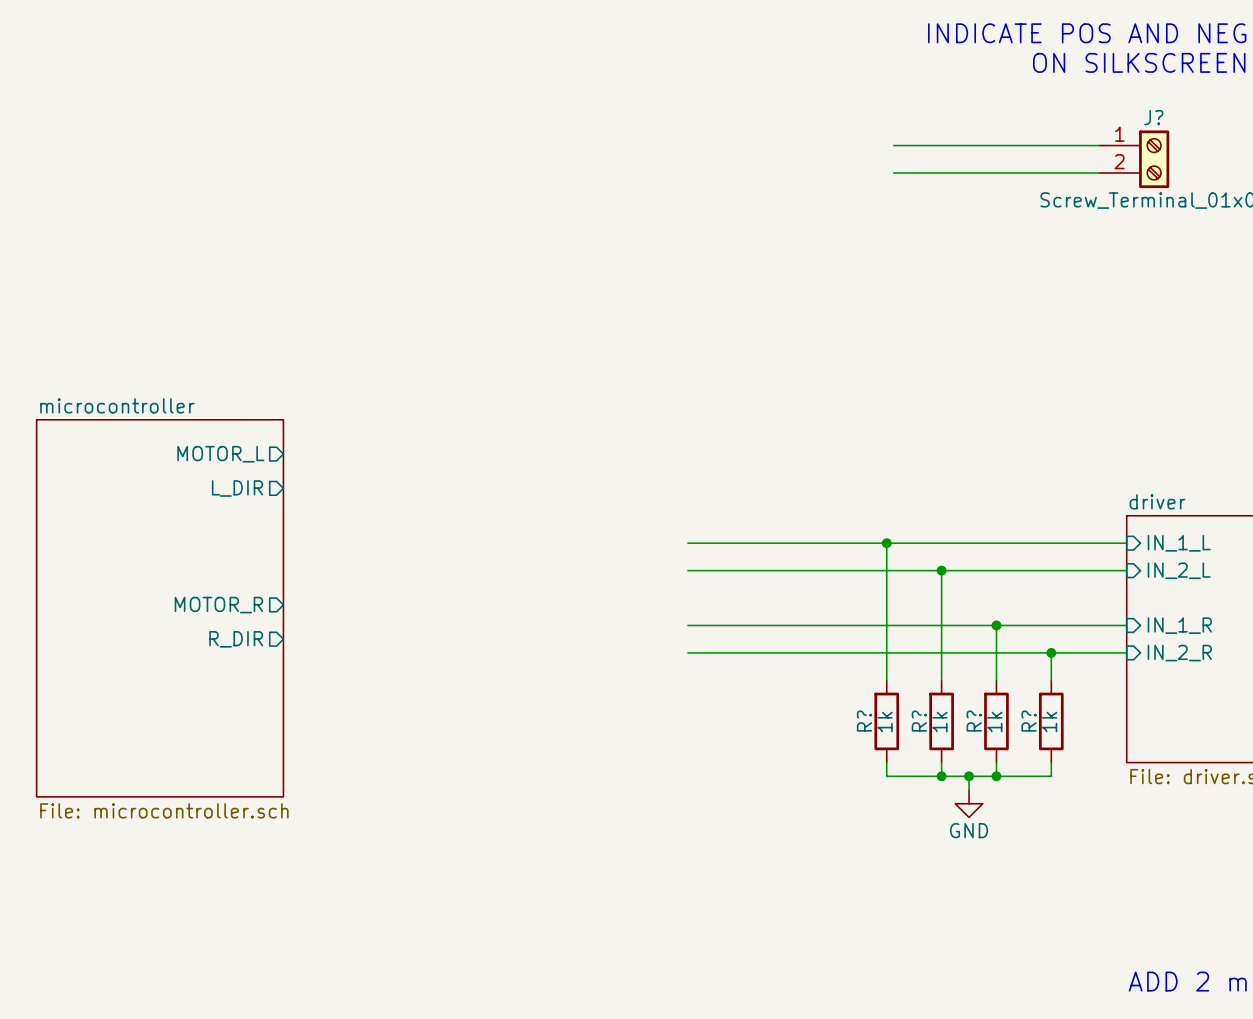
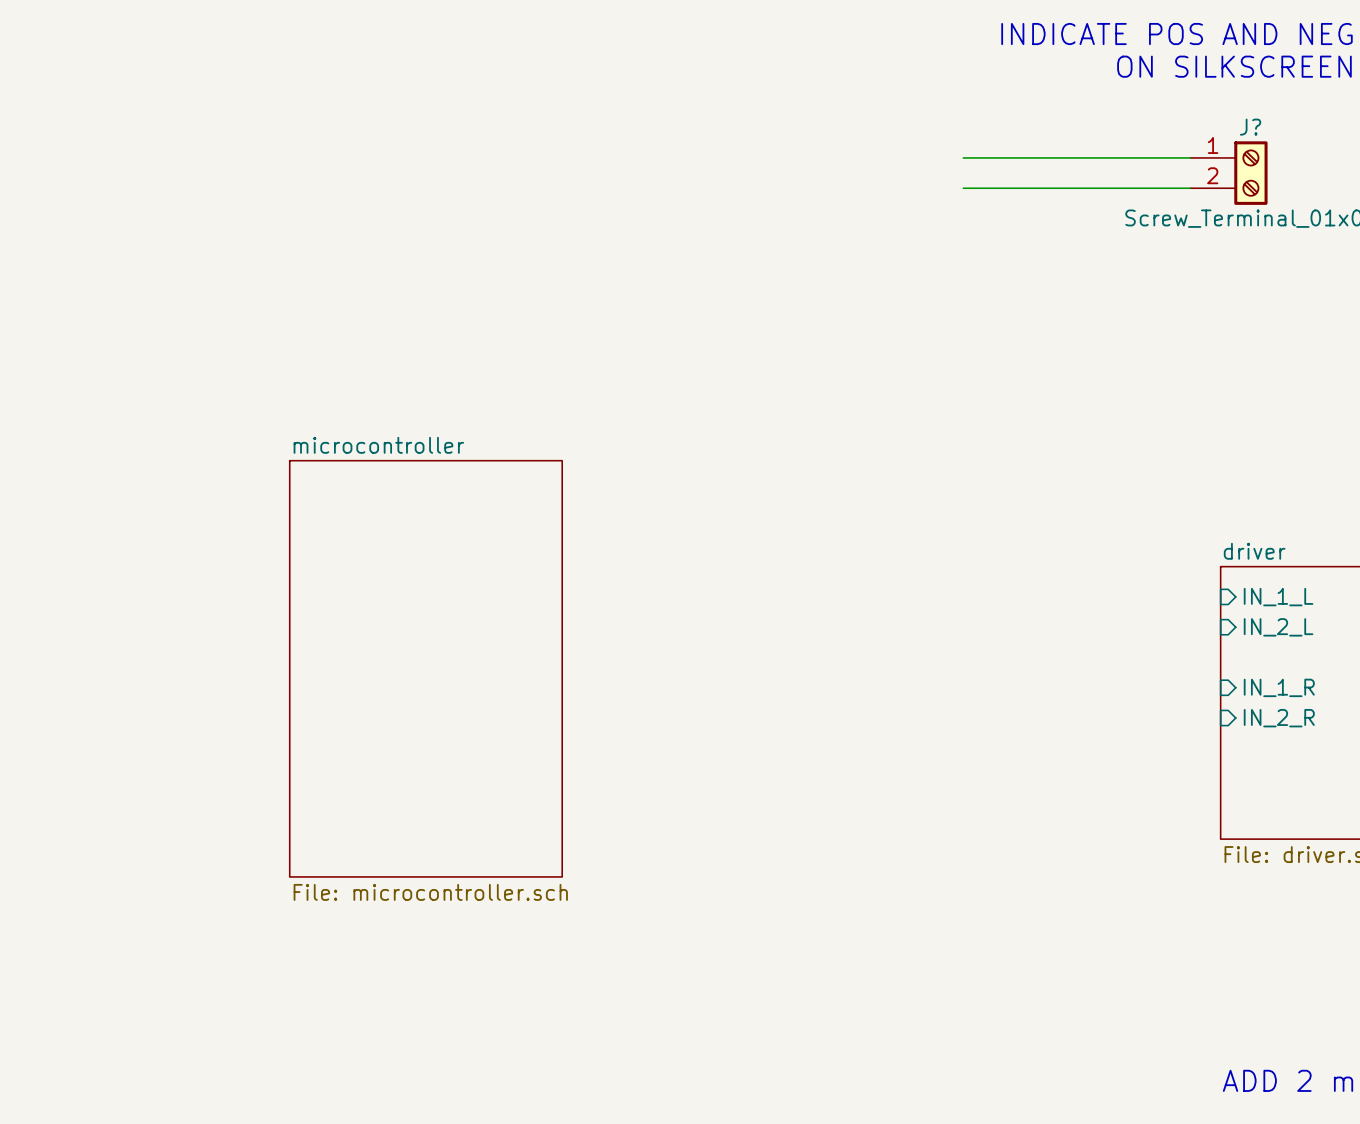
sheet pin: MOTOR_L (220, 454) -> none
sheet pin: L_DIR (237, 488) -> none
wire: (687, 543) (1126, 543) -> none
wire: (886, 543) (886, 680) -> none
junction: (886, 543) -> none
wire: (687, 570) (1126, 570) -> none
wire: (941, 570) (941, 680) -> none
junction: (941, 570) -> none
sheet pin: MOTOR_R (218, 605) -> none
sheet microcontroller position: (160, 608) -> (425, 668)
wire: (687, 625) (1126, 625) -> none
wire: (996, 625) (996, 680) -> none
junction: (996, 625) -> none
sheet pin: R_DIR (236, 639) -> none
wire: (687, 652) (1126, 652) -> none
wire: (1051, 652) (1051, 680) -> none
junction: (1051, 652) -> none
R?: (886, 721) -> none
R?: (941, 721) -> none
R?: (996, 721) -> none
R?: (1051, 721) -> none
wire: (886, 762) (886, 776) (1051, 776) (1051, 762) -> none
wire: (941, 762) (941, 776) -> none
wire: (996, 762) (996, 776) -> none
junction: (941, 776) -> none
wire: (969, 776) (969, 790) -> none
junction: (969, 776) -> none
junction: (996, 776) -> none
power symbol: GND (969, 803) -> none

